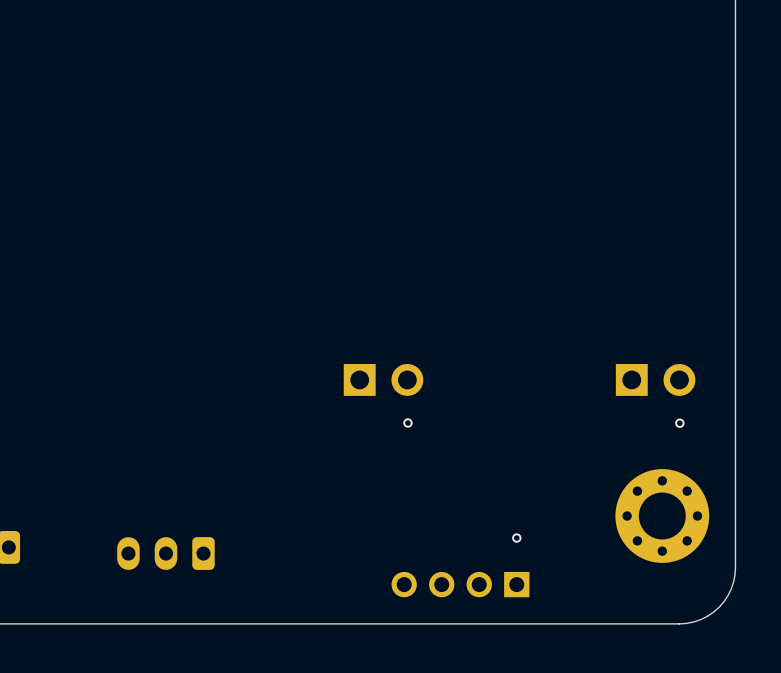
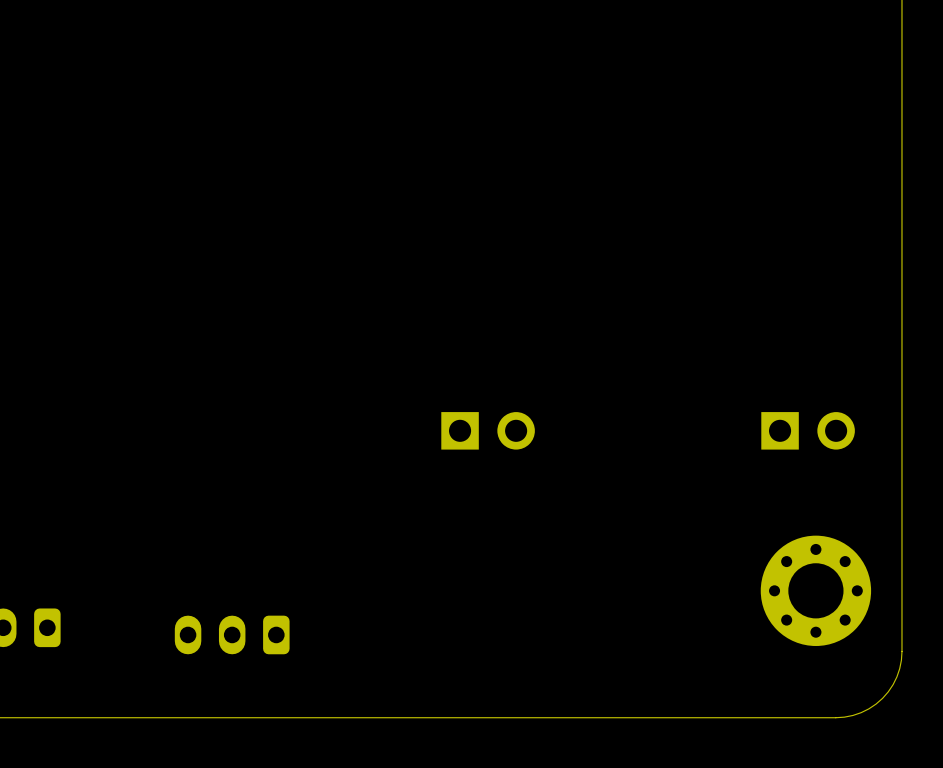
via: (407, 423) -> none
via: (679, 423) -> none
via: (516, 538) -> none
part: (460, 584) -> none

